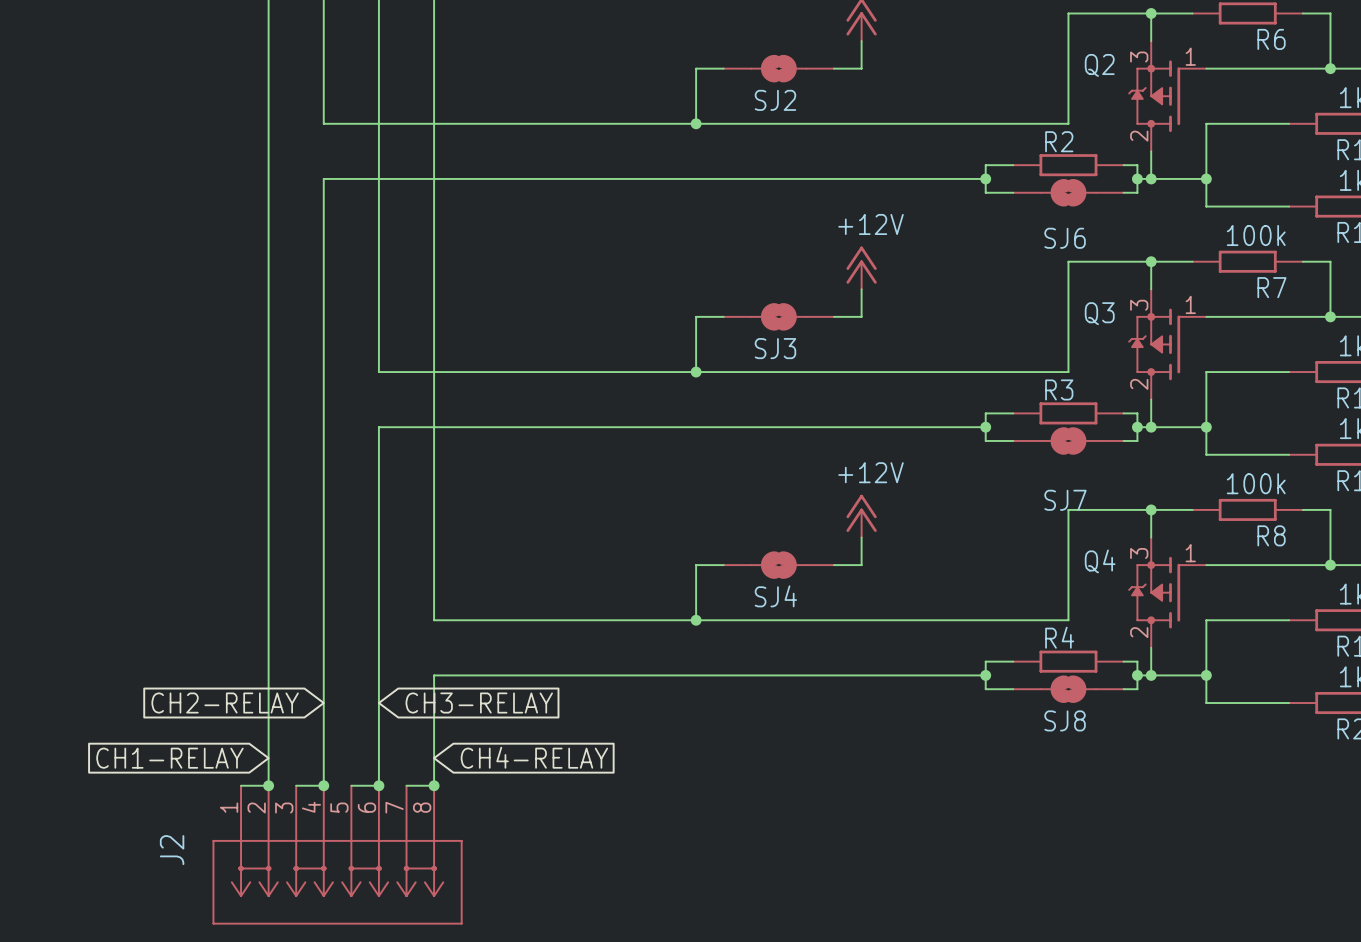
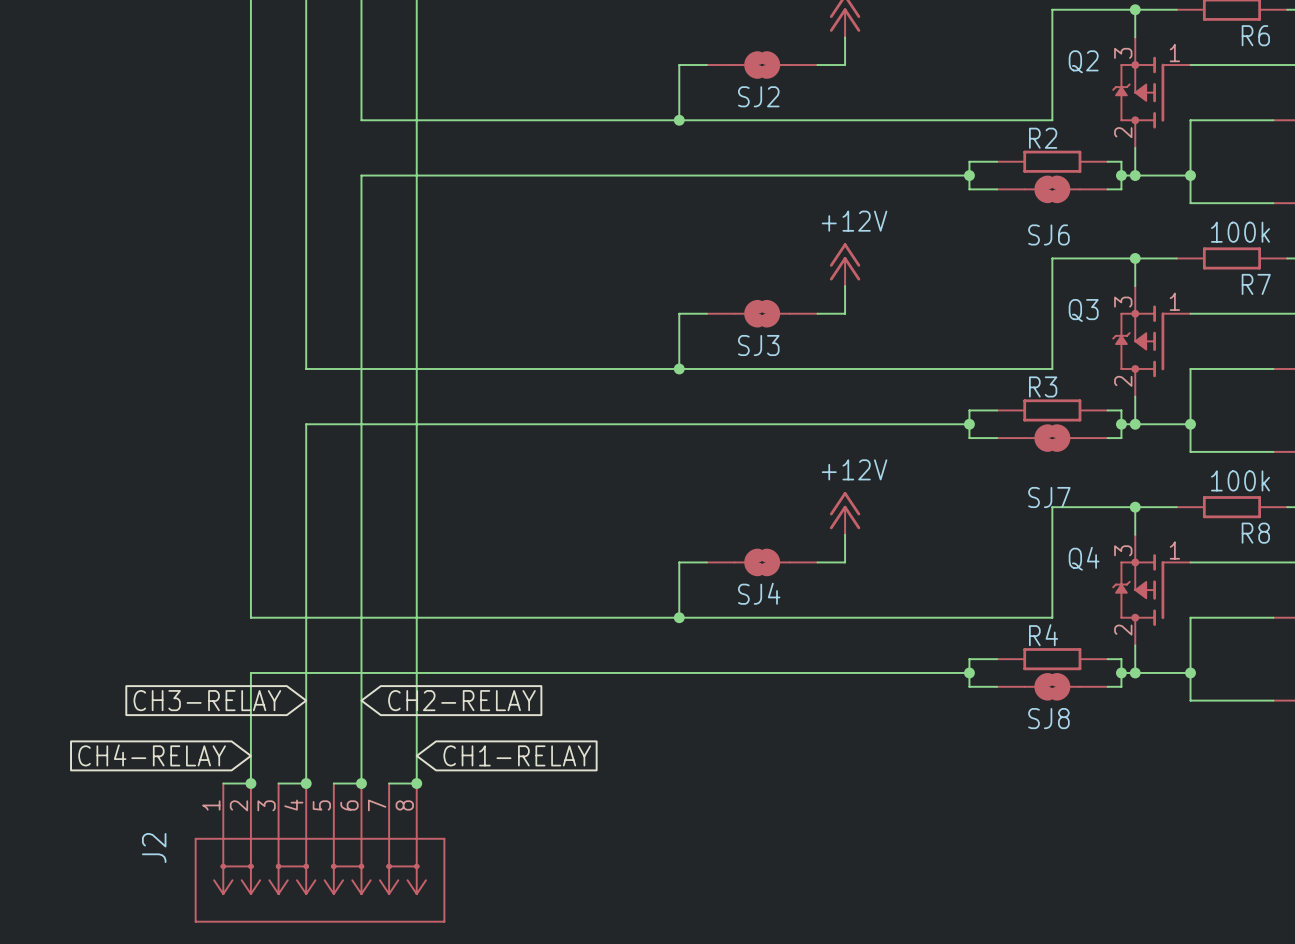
wire: (323, 123) (378, 123) (378, 178) (323, 178) -> (306, 120) (306, 175)
wire: (323, 372) (323, 427) -> (306, 368) (361, 368) (361, 424) (306, 424)
wire: (268, 620) (268, 675) -> (250, 617) (416, 617) (416, 672) (250, 672)
global label: CH2-RELAY (225, 703) -> CH3-RELAY (207, 700)
global label: CH3-RELAY (479, 703) -> CH2-RELAY (461, 700)
global label: CH4-RELAY (534, 757) -> CH1-RELAY (517, 755)
global label: CH1-RELAY (169, 758) -> CH4-RELAY (152, 755)

